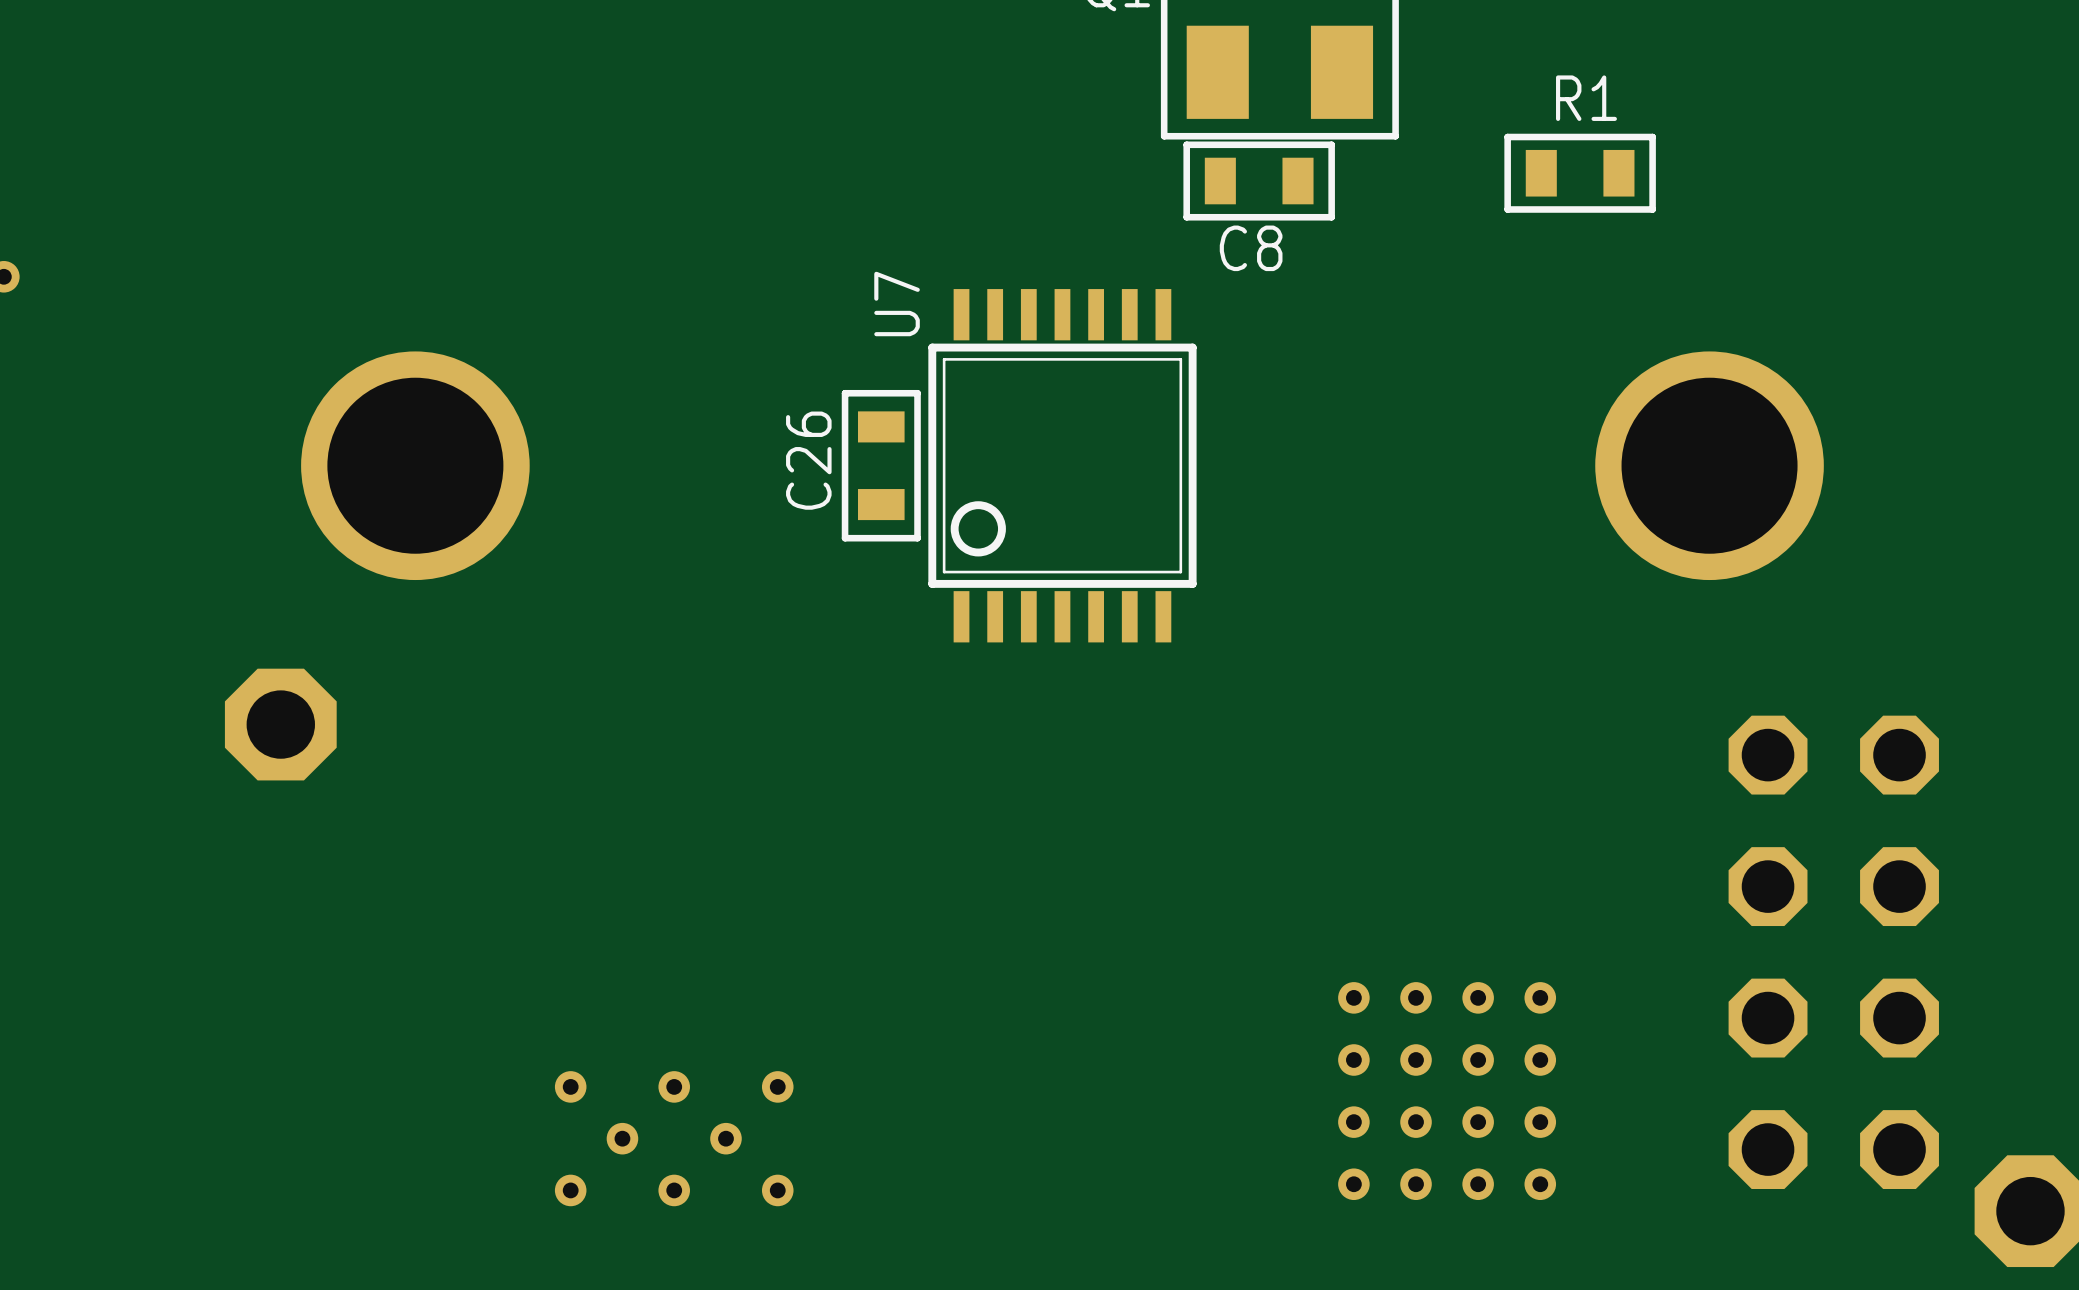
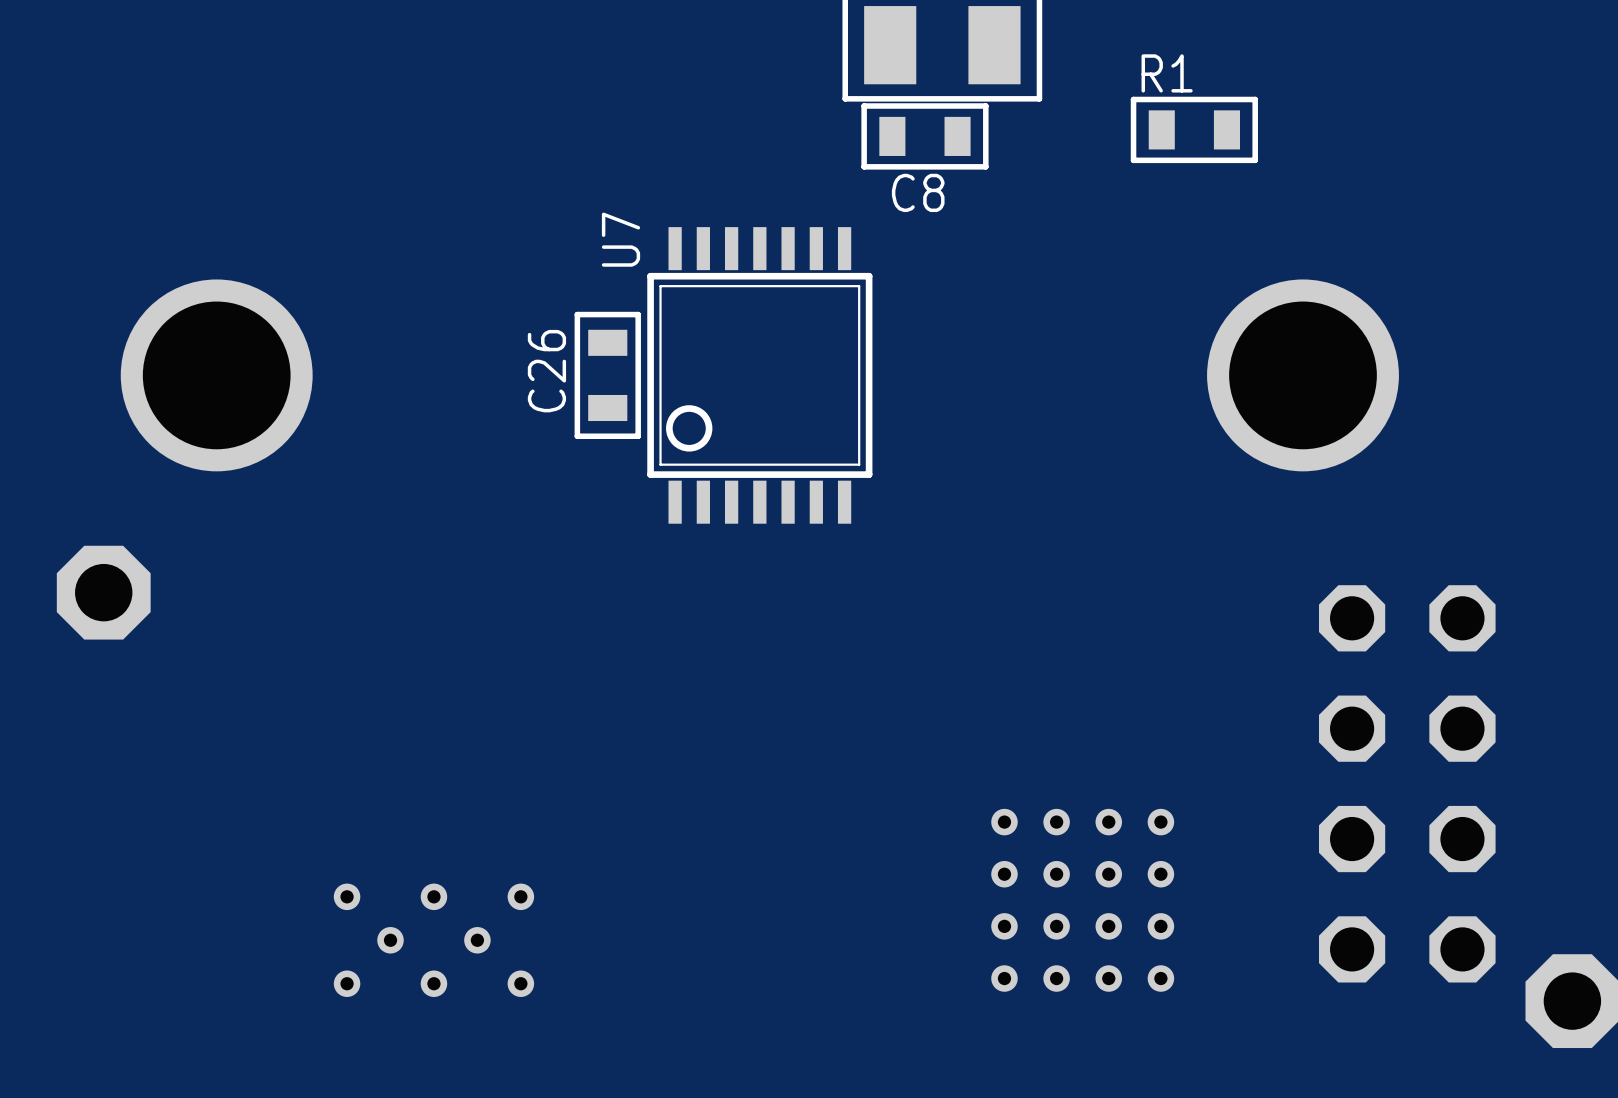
R1 name position: R1 (1586, 98) -> R1 (1167, 73)

